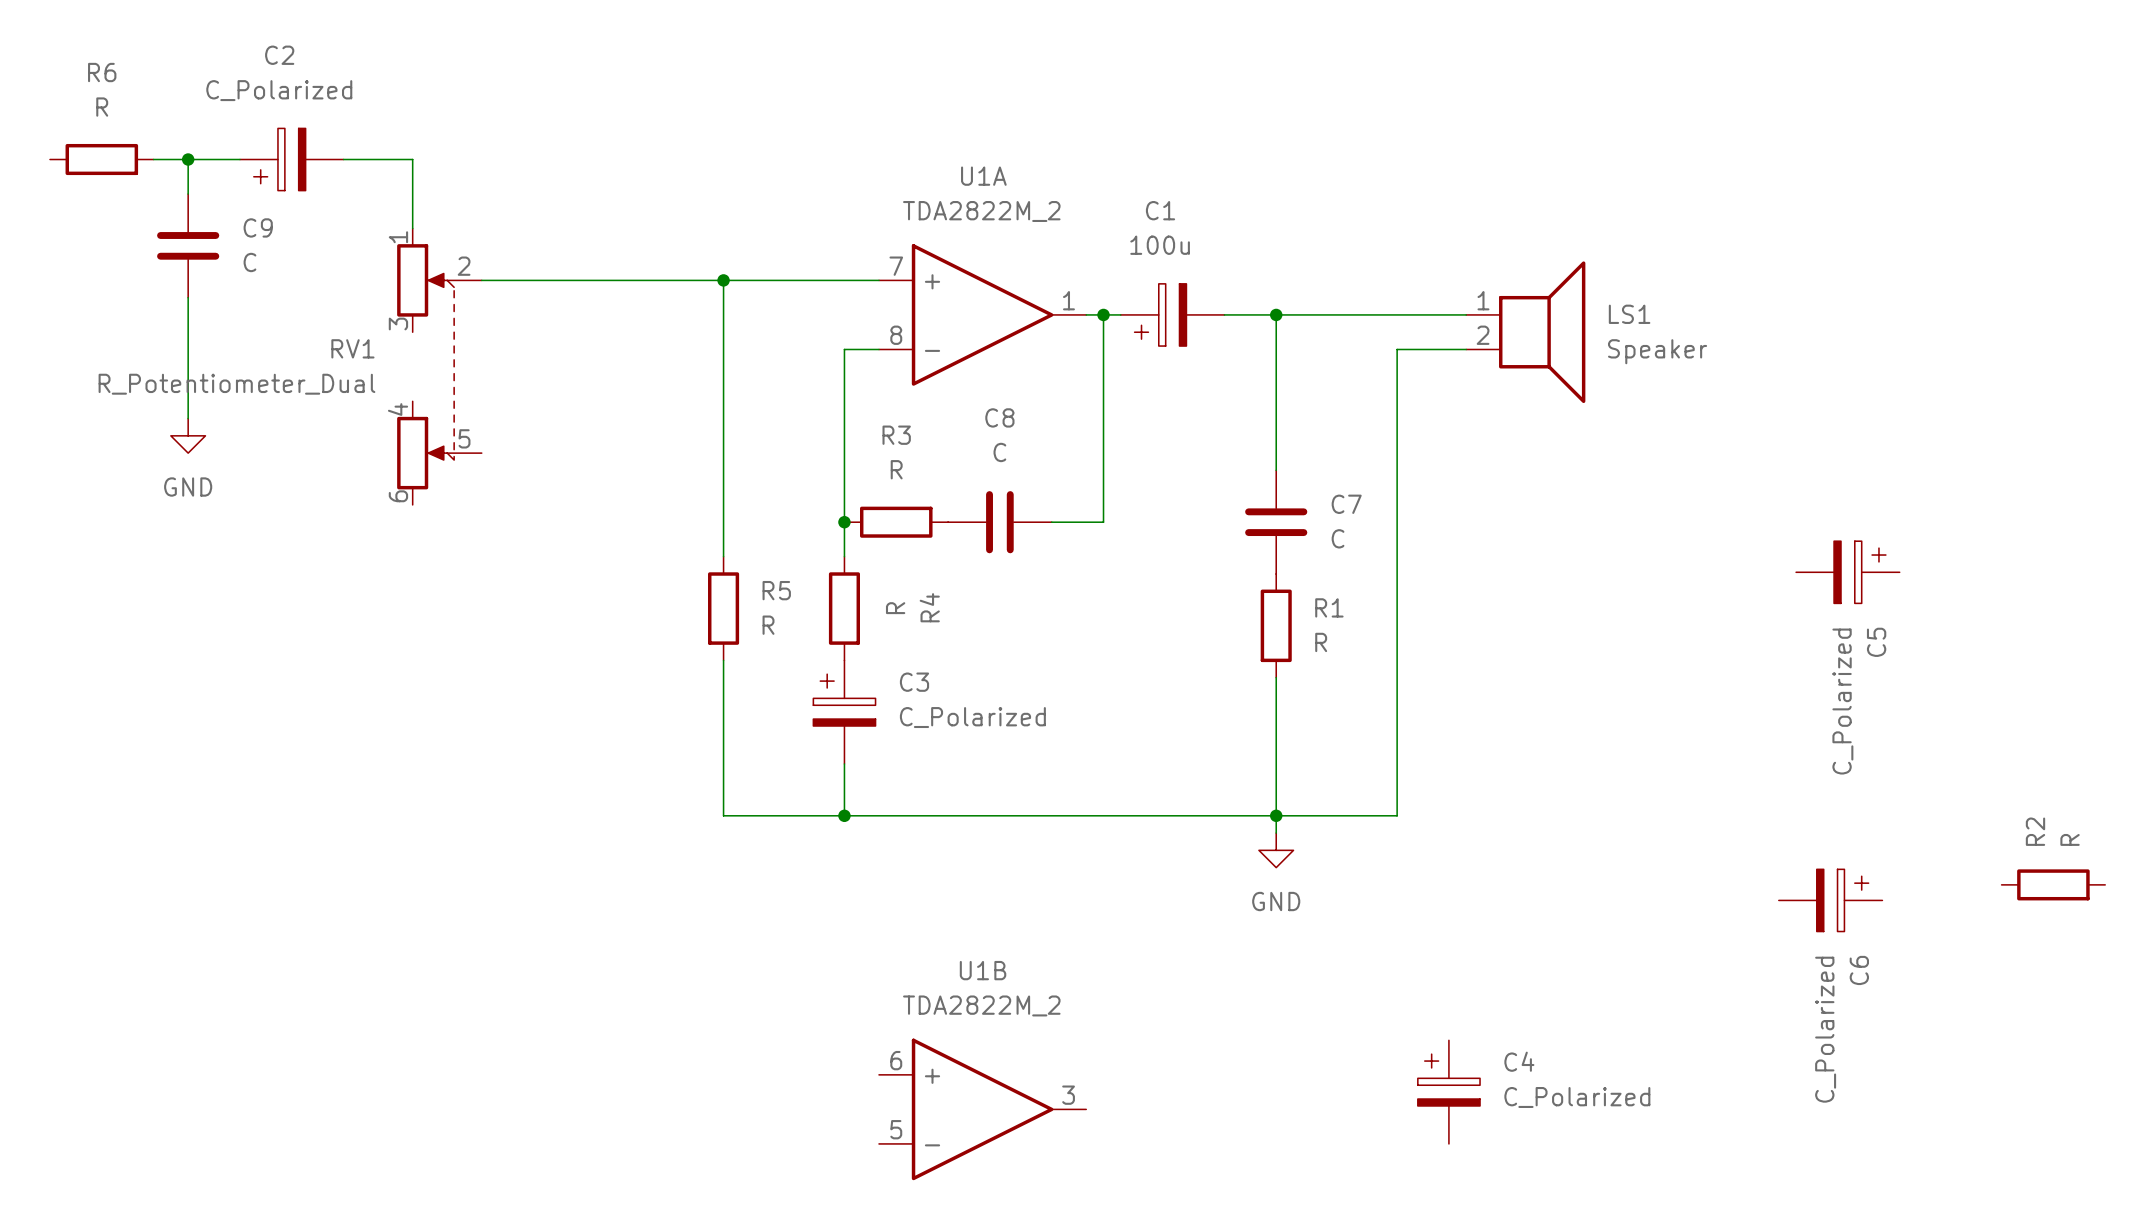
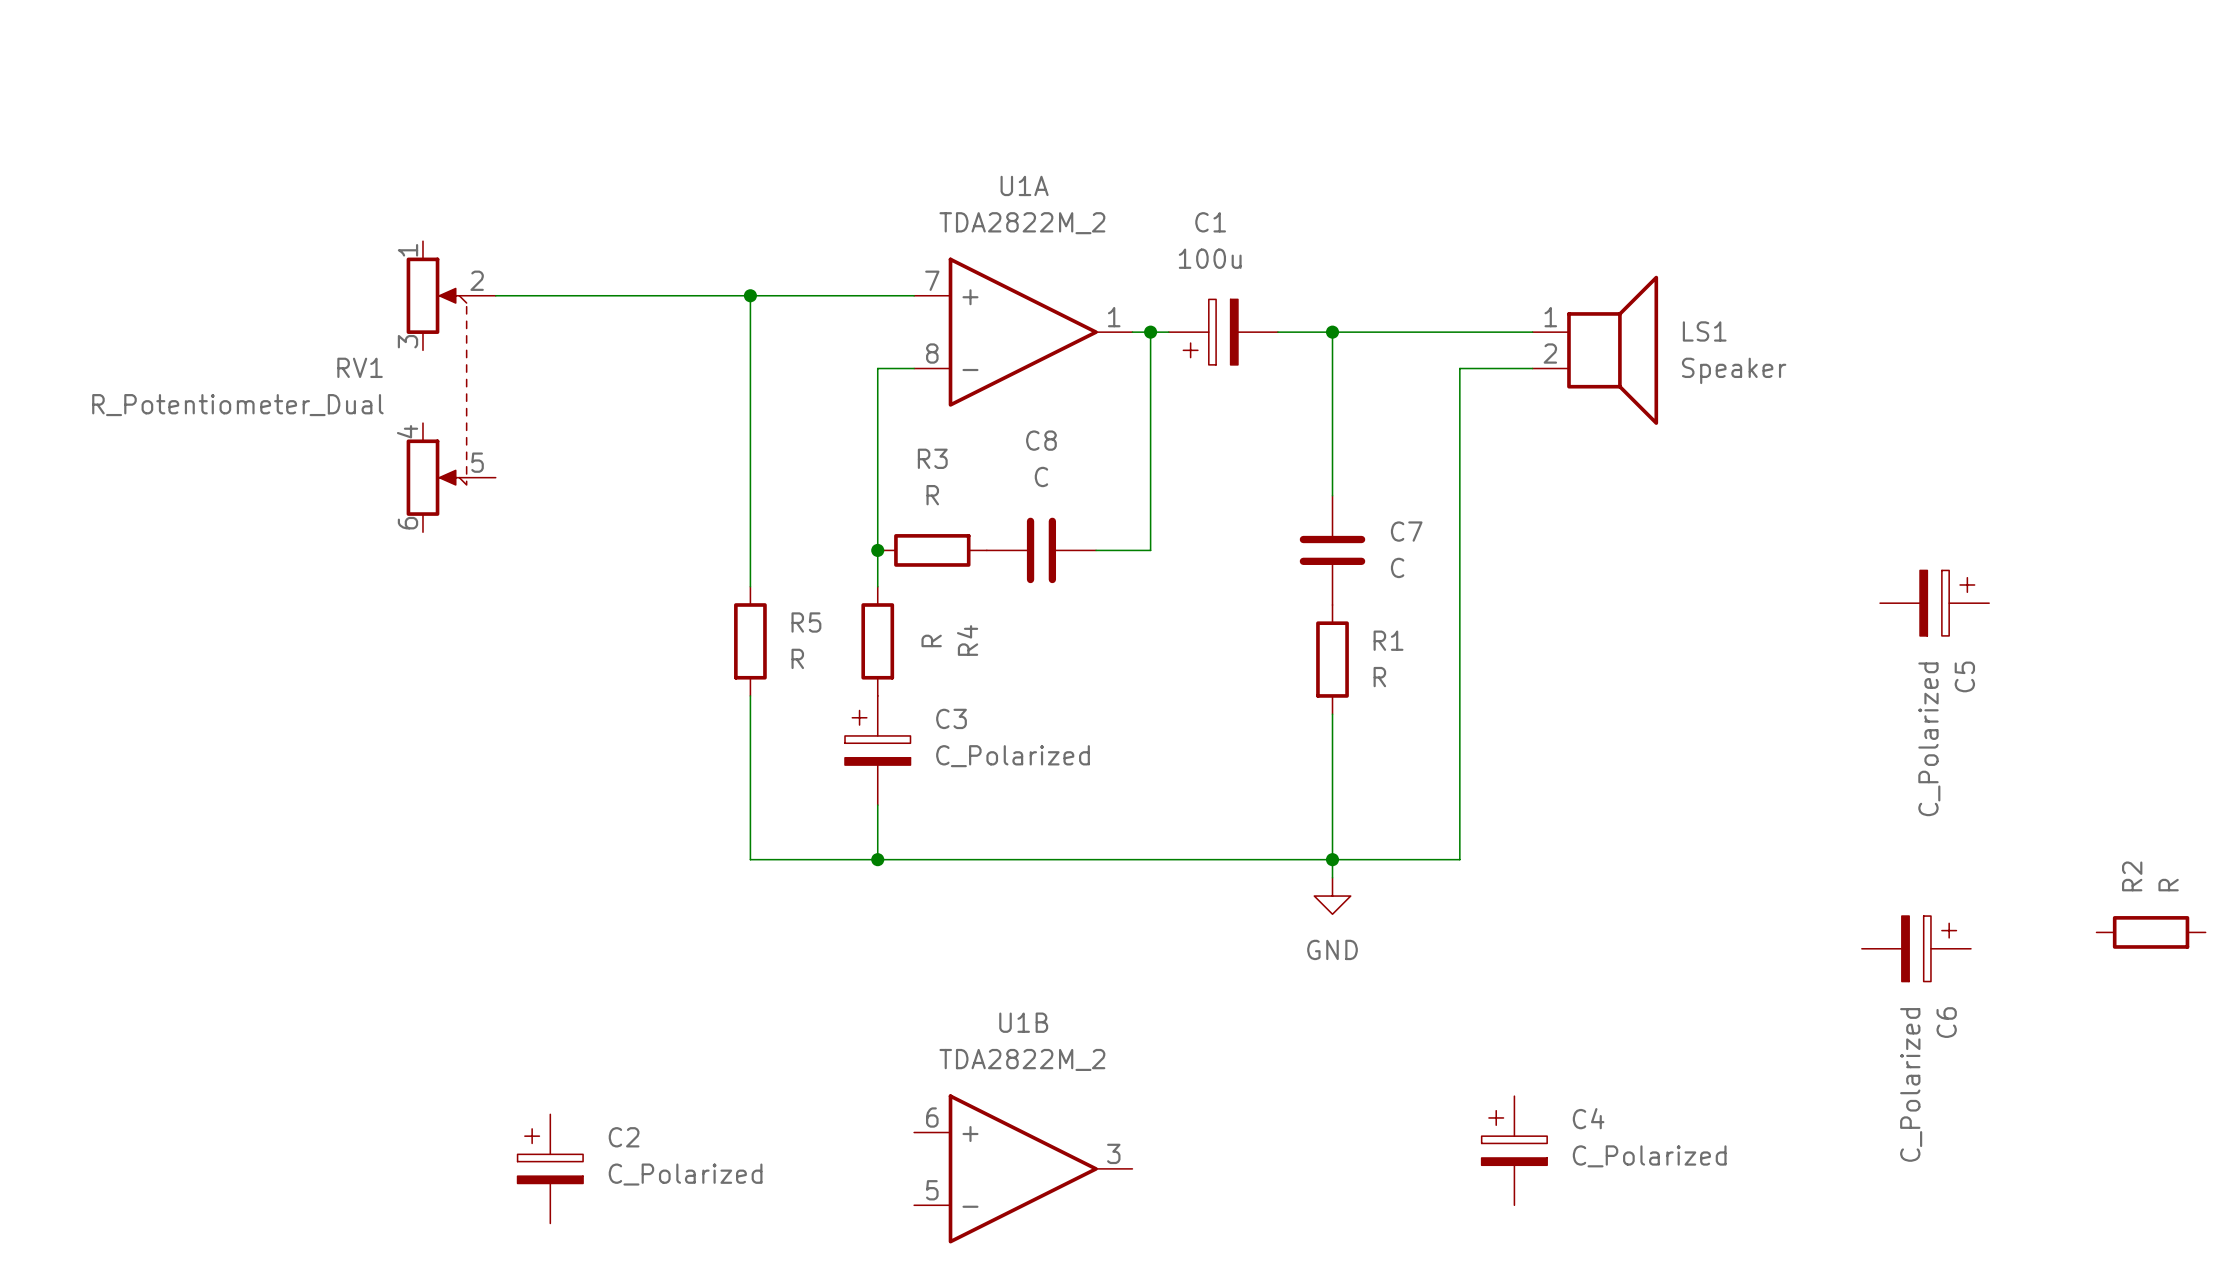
C2 name position: C2 (279, 55) -> C2 (624, 1137)
C2 value position: C_Polarized (279, 90) -> C_Polarized (685, 1174)
R6: R (101, 159) -> none
wire: (153, 159) (239, 159) -> none
wire: (188, 159) (188, 194) -> none
junction: (188, 159) -> none
C2 rotation: 0° (279, 159) -> 90° clockwise (550, 1156)
C2 position: (291, 159) -> (550, 1168)
wire: (343, 159) (412, 159) (412, 228) -> none
C9: C (188, 245) -> none
wire: (188, 297) (188, 418) -> none
power symbol: GND (188, 435) -> none

